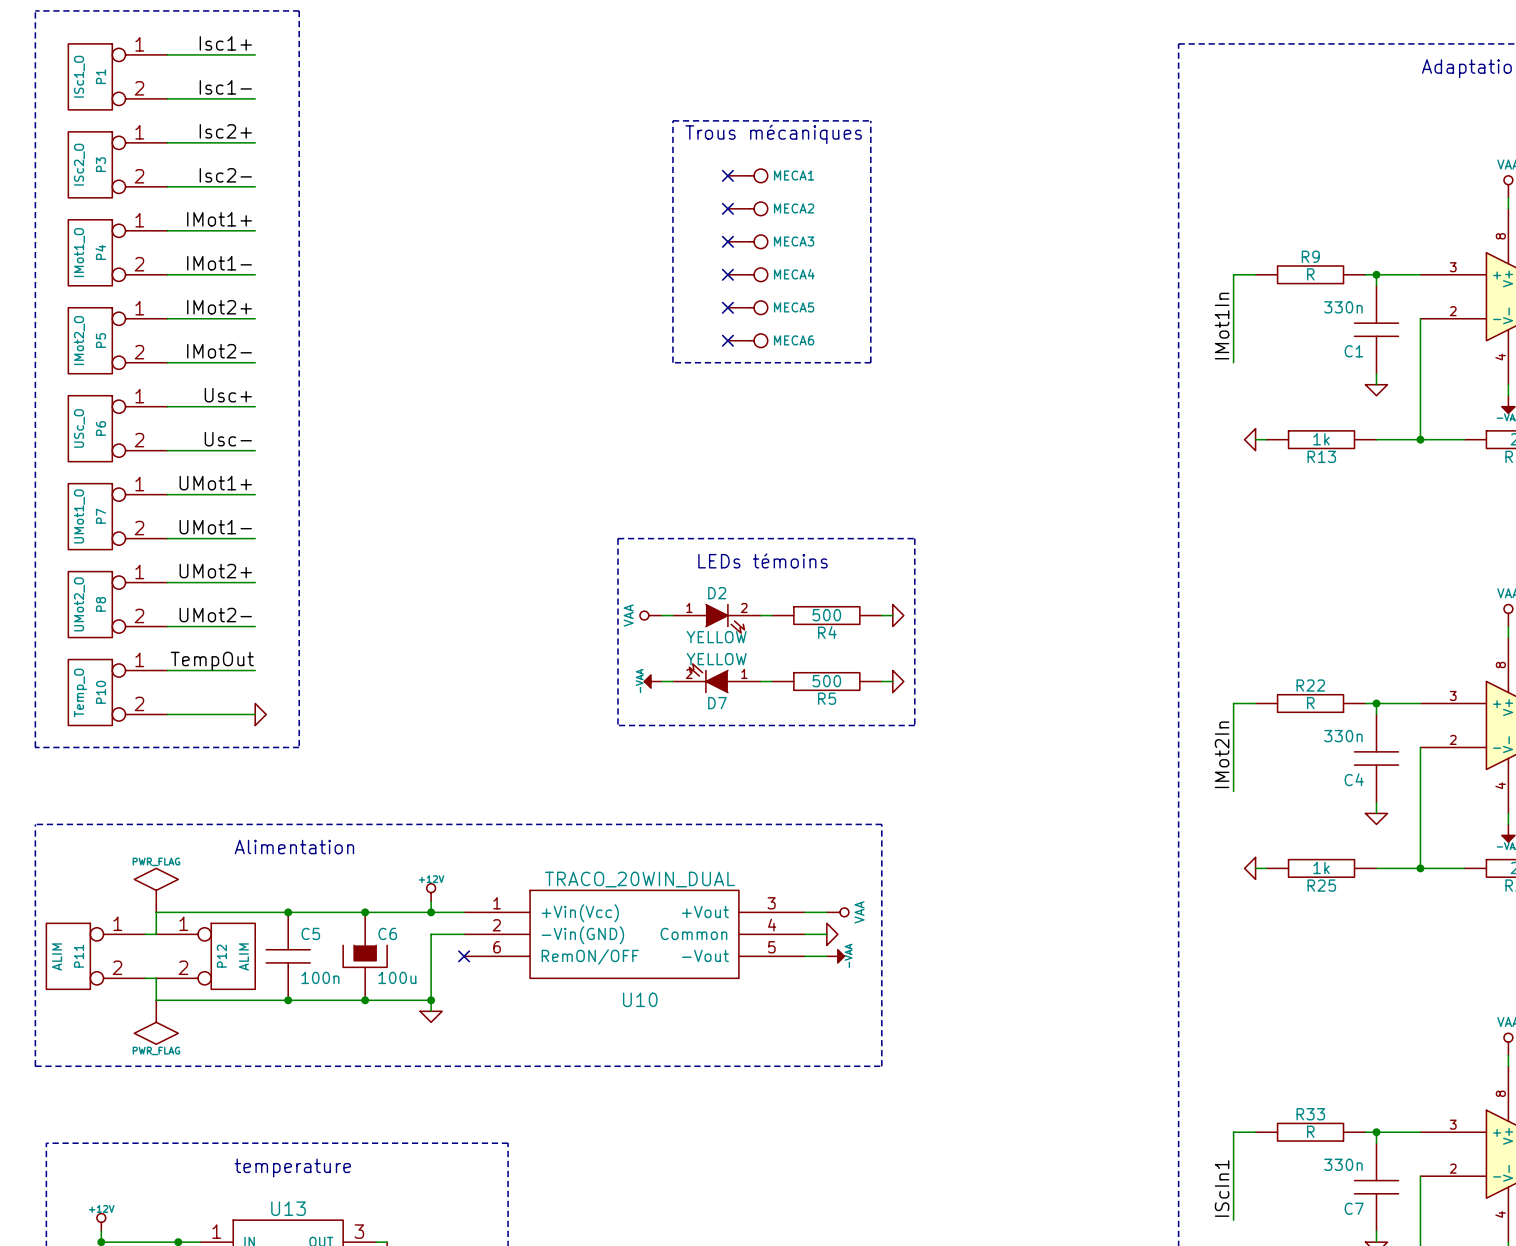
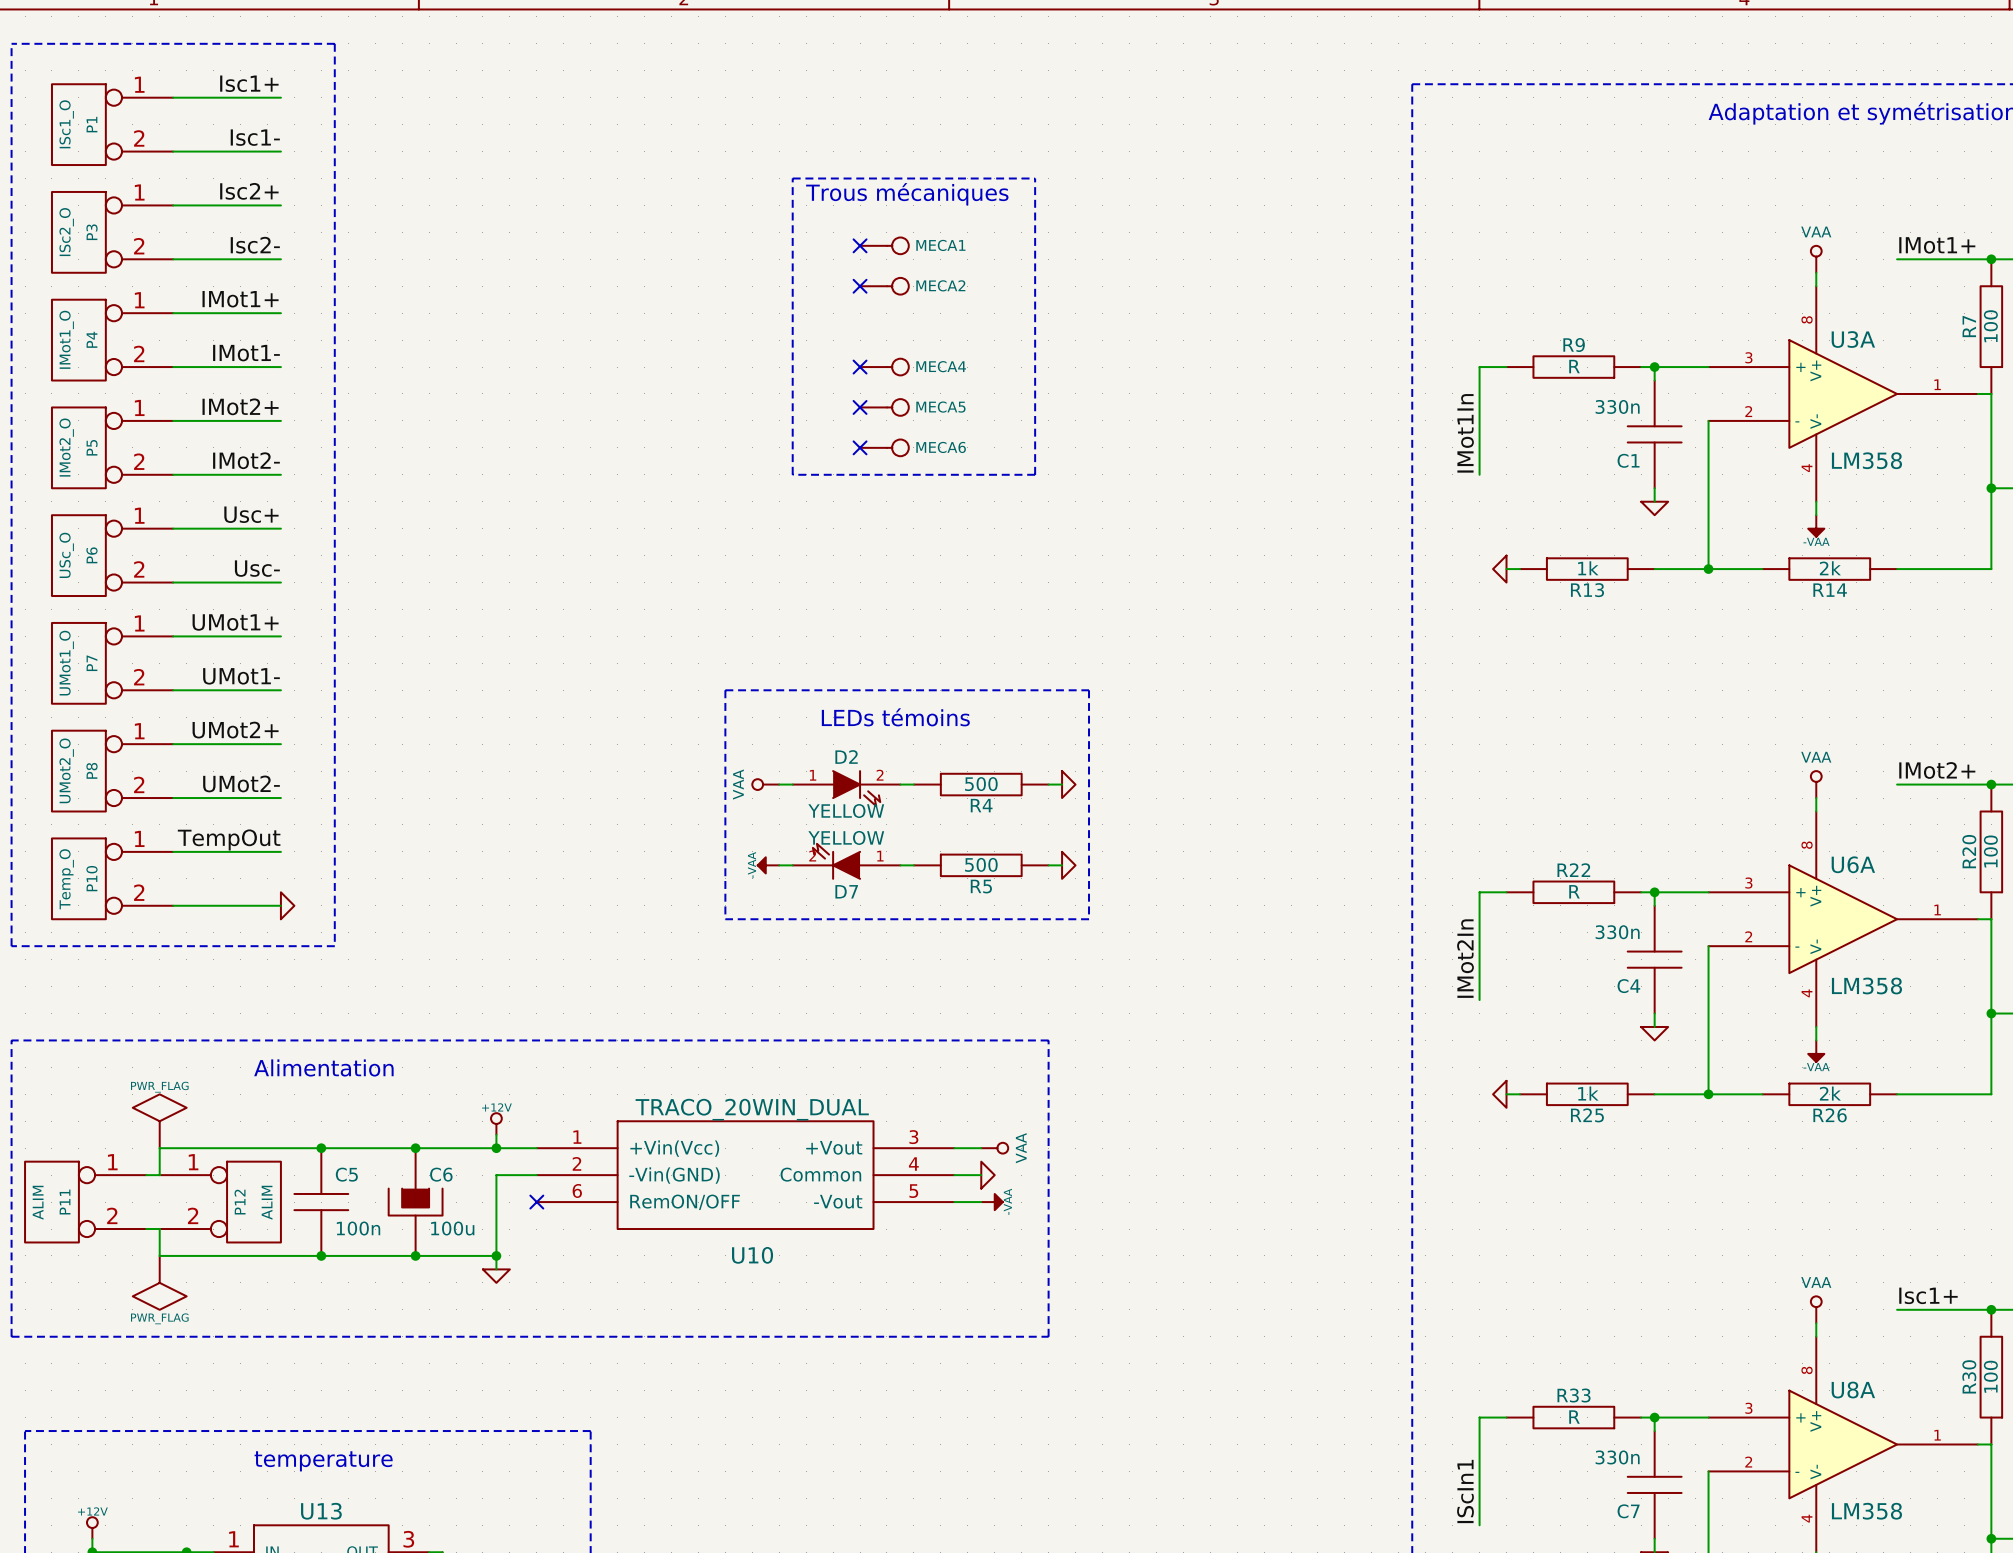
no-connect mark: (727, 241) -> none
MECA3: (747, 241) -> none

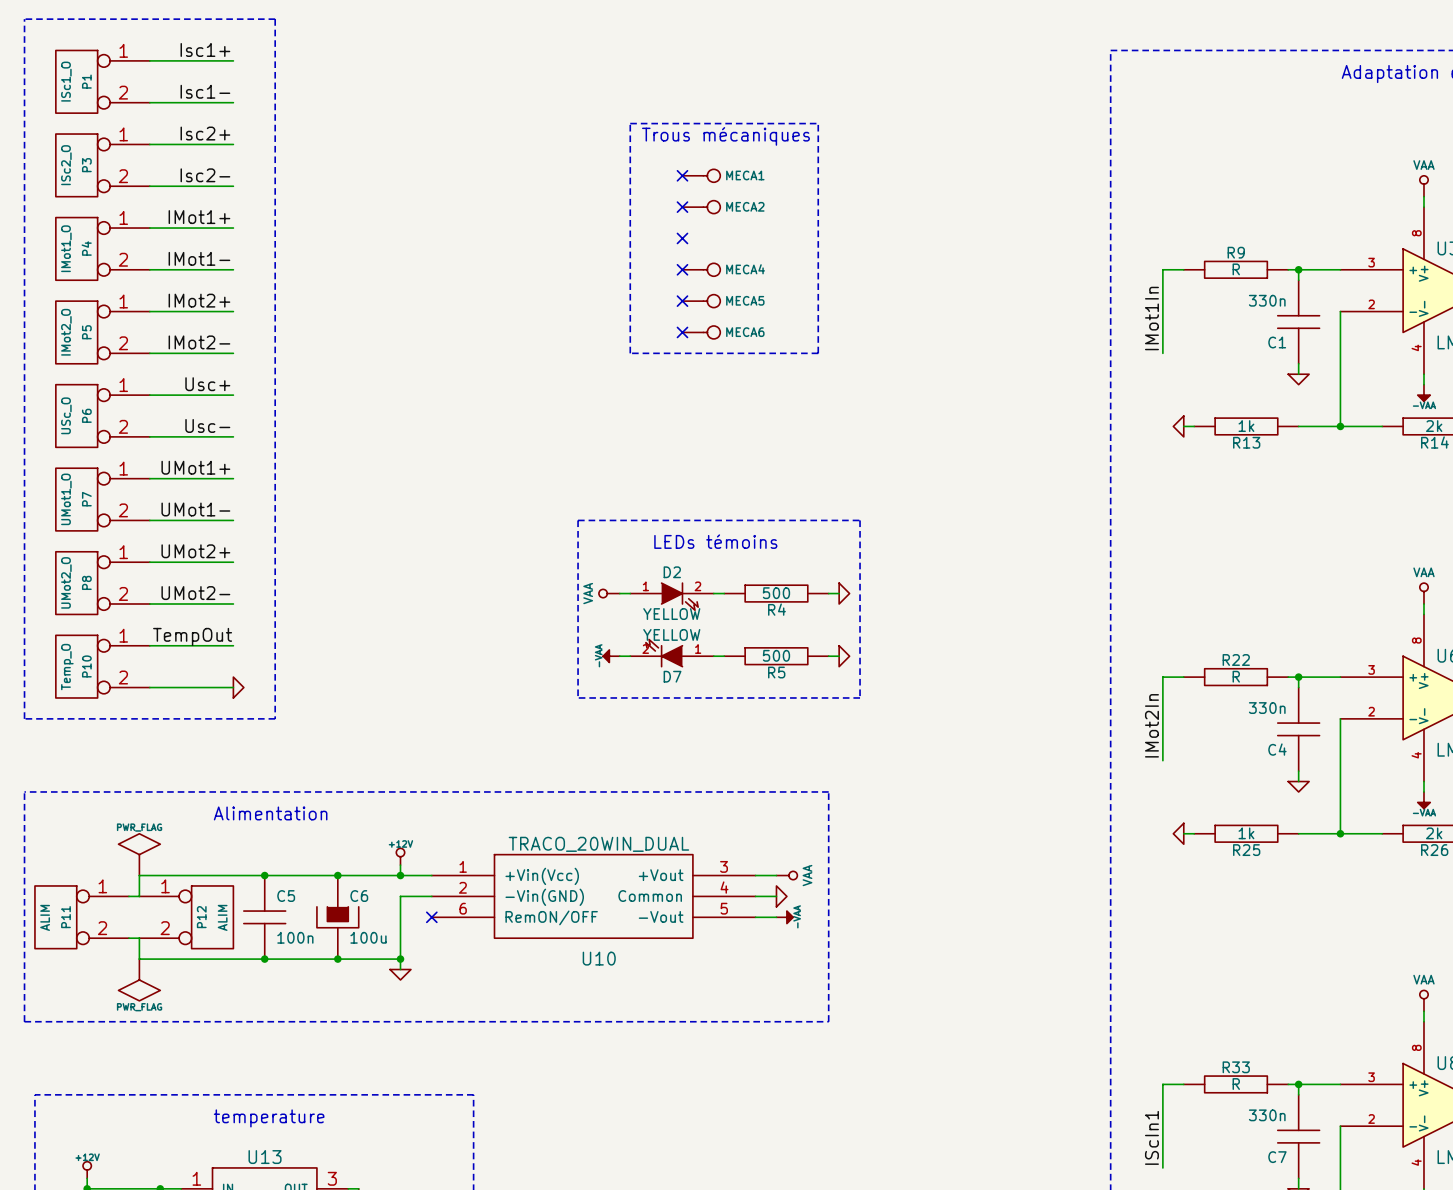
no-connect mark: none -> (682, 238)

